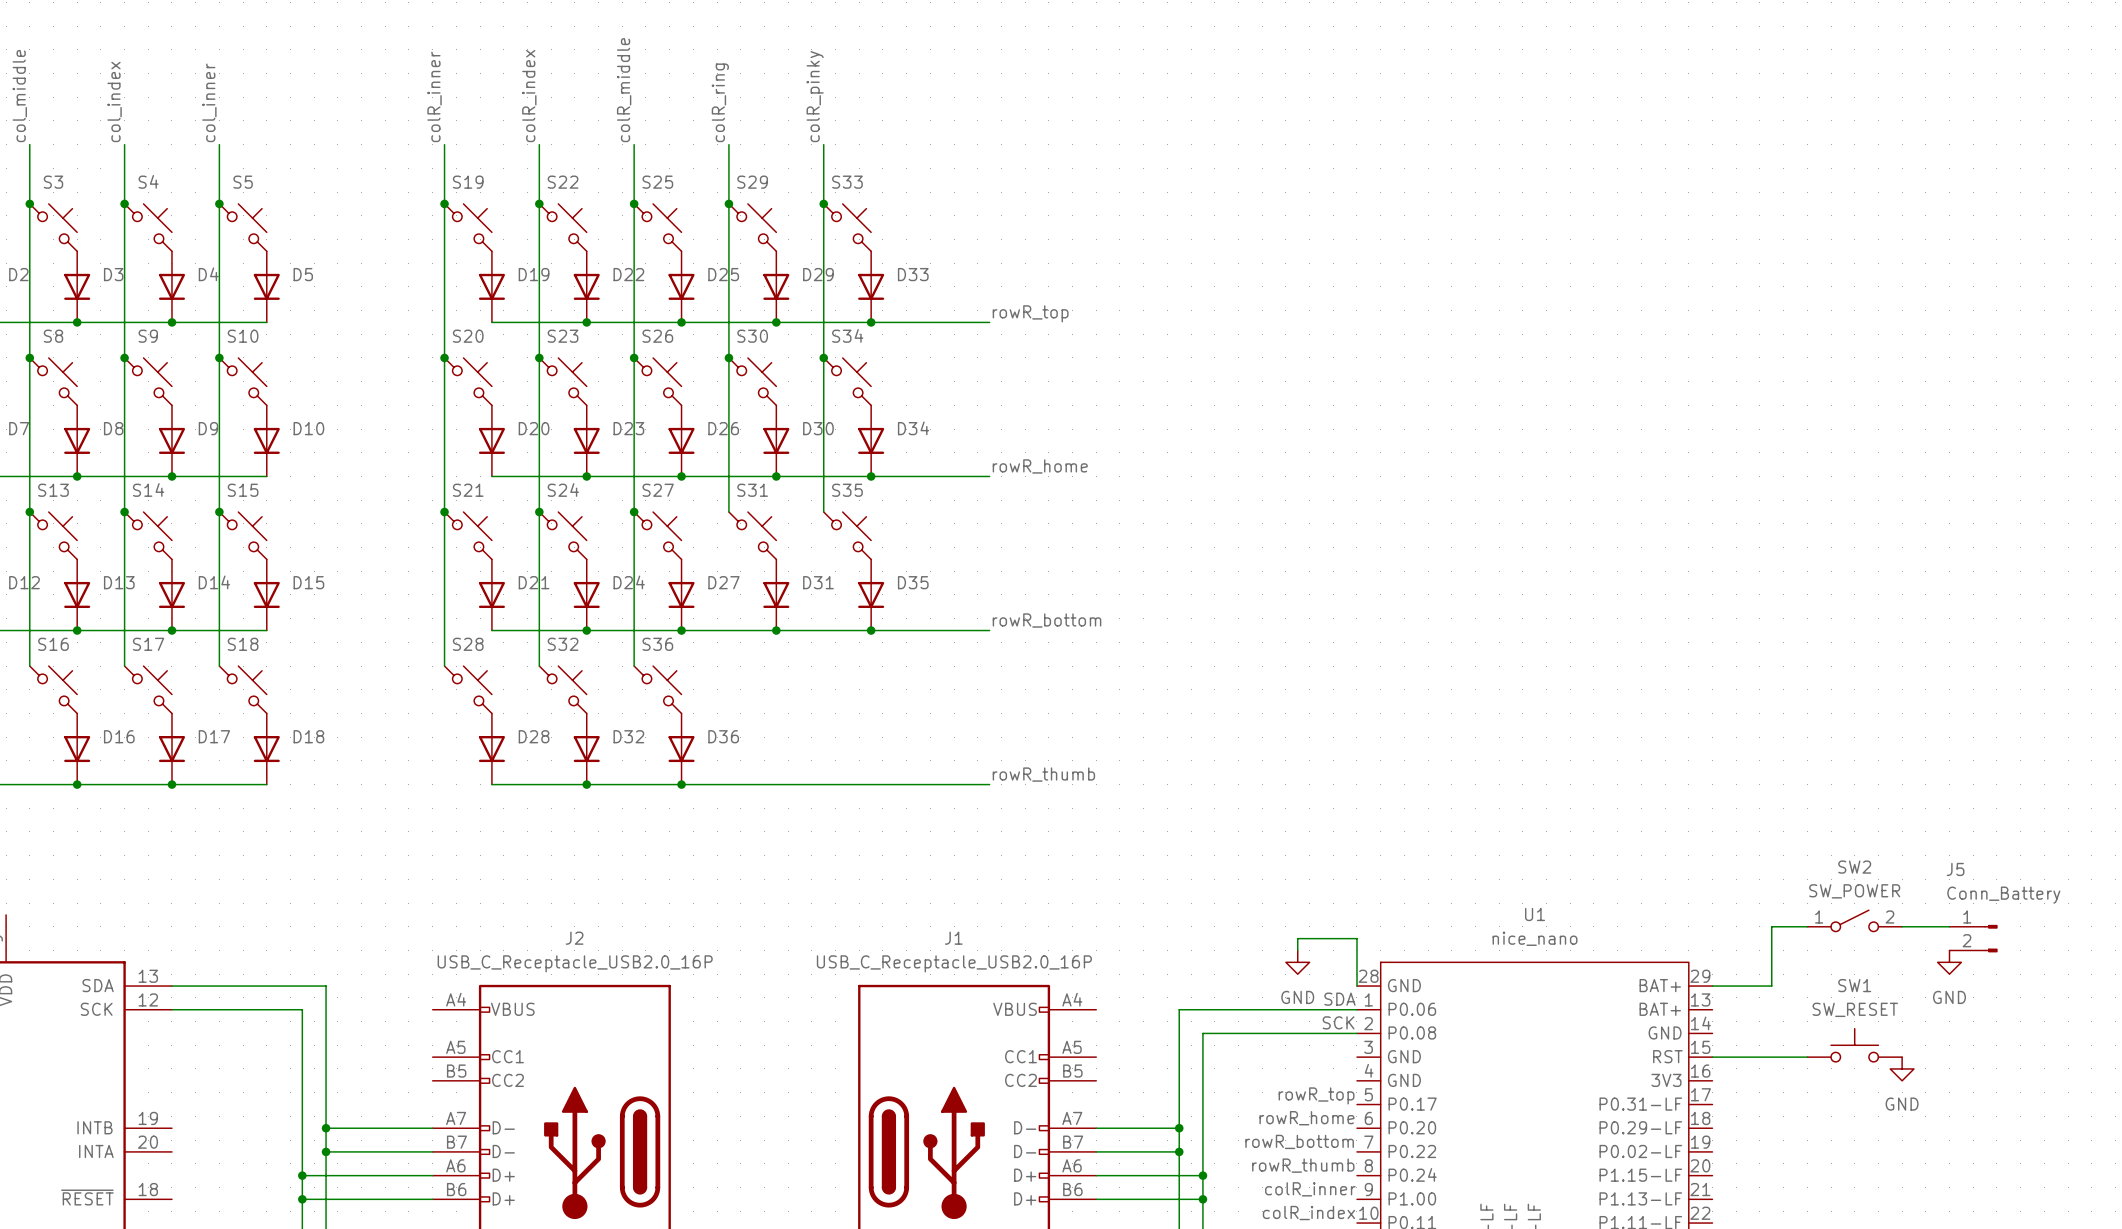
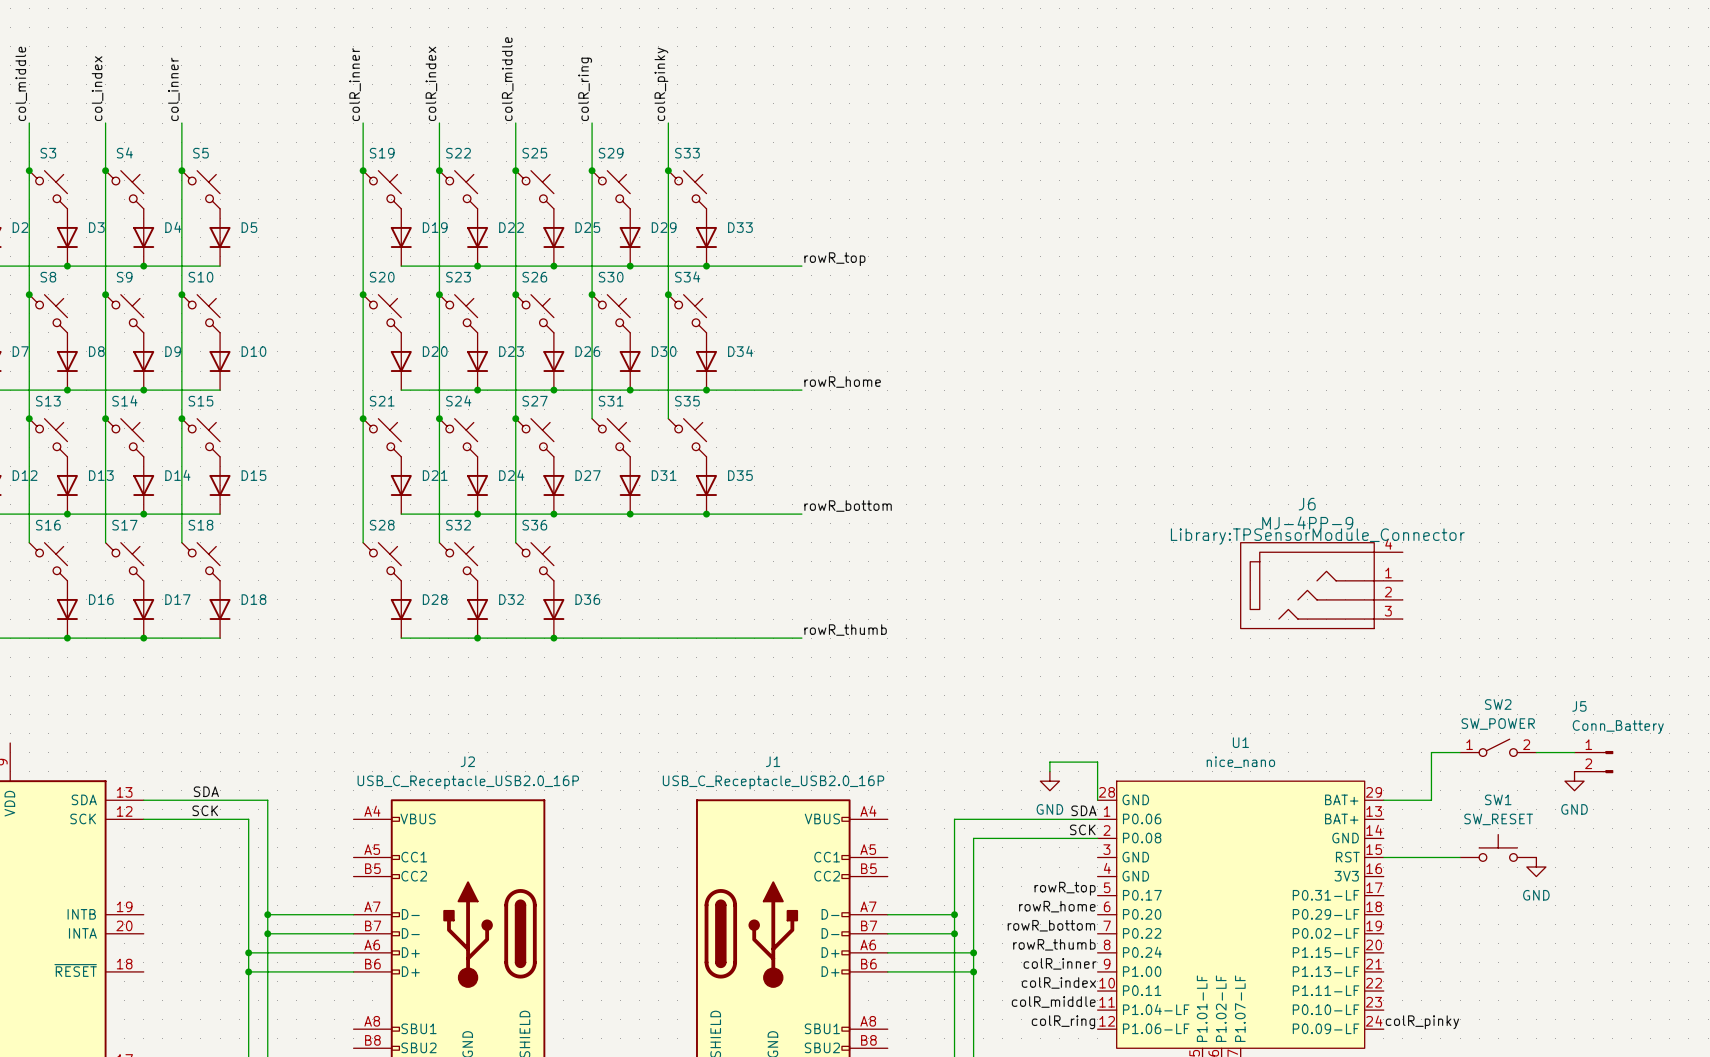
J6: none -> MJ-4PP-9 (1321, 585)
label: none -> SDA (206, 791)
label: none -> SCK (205, 810)

